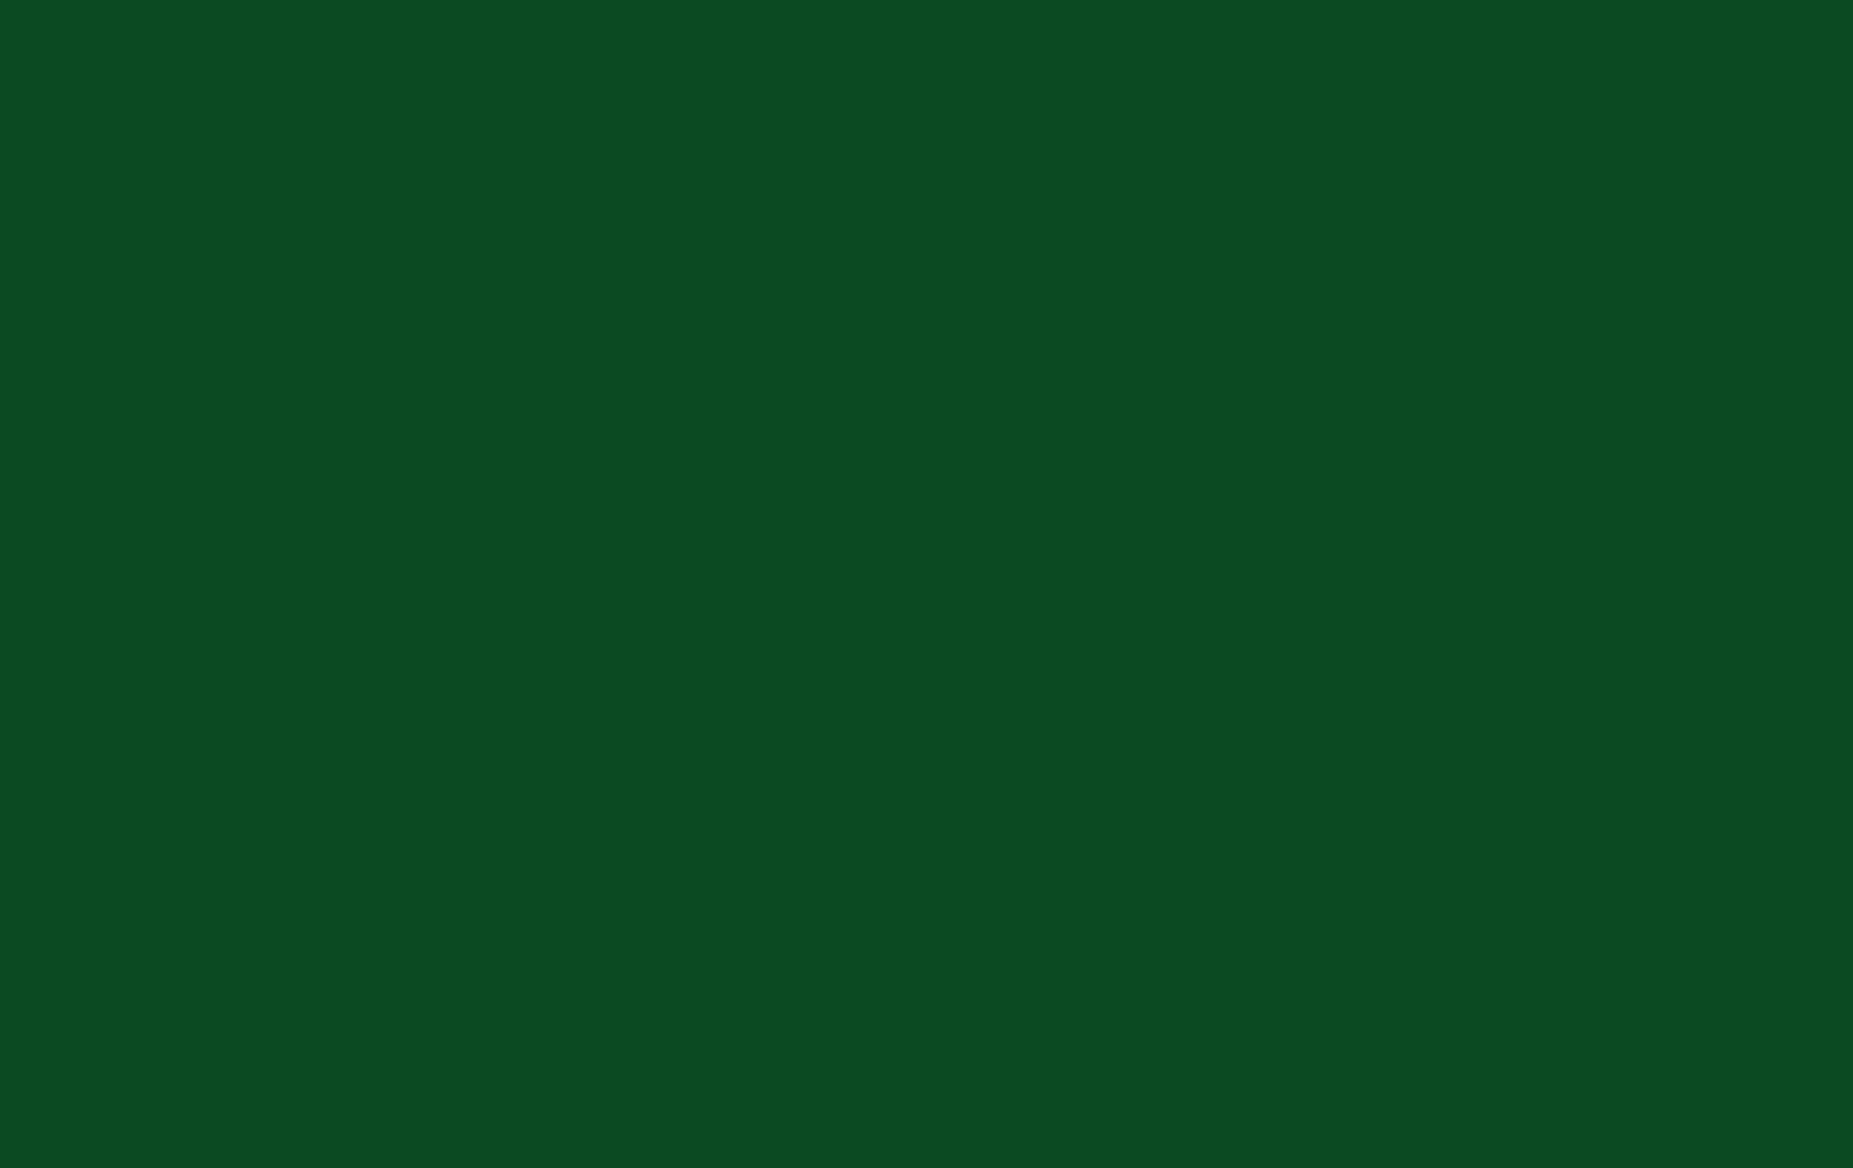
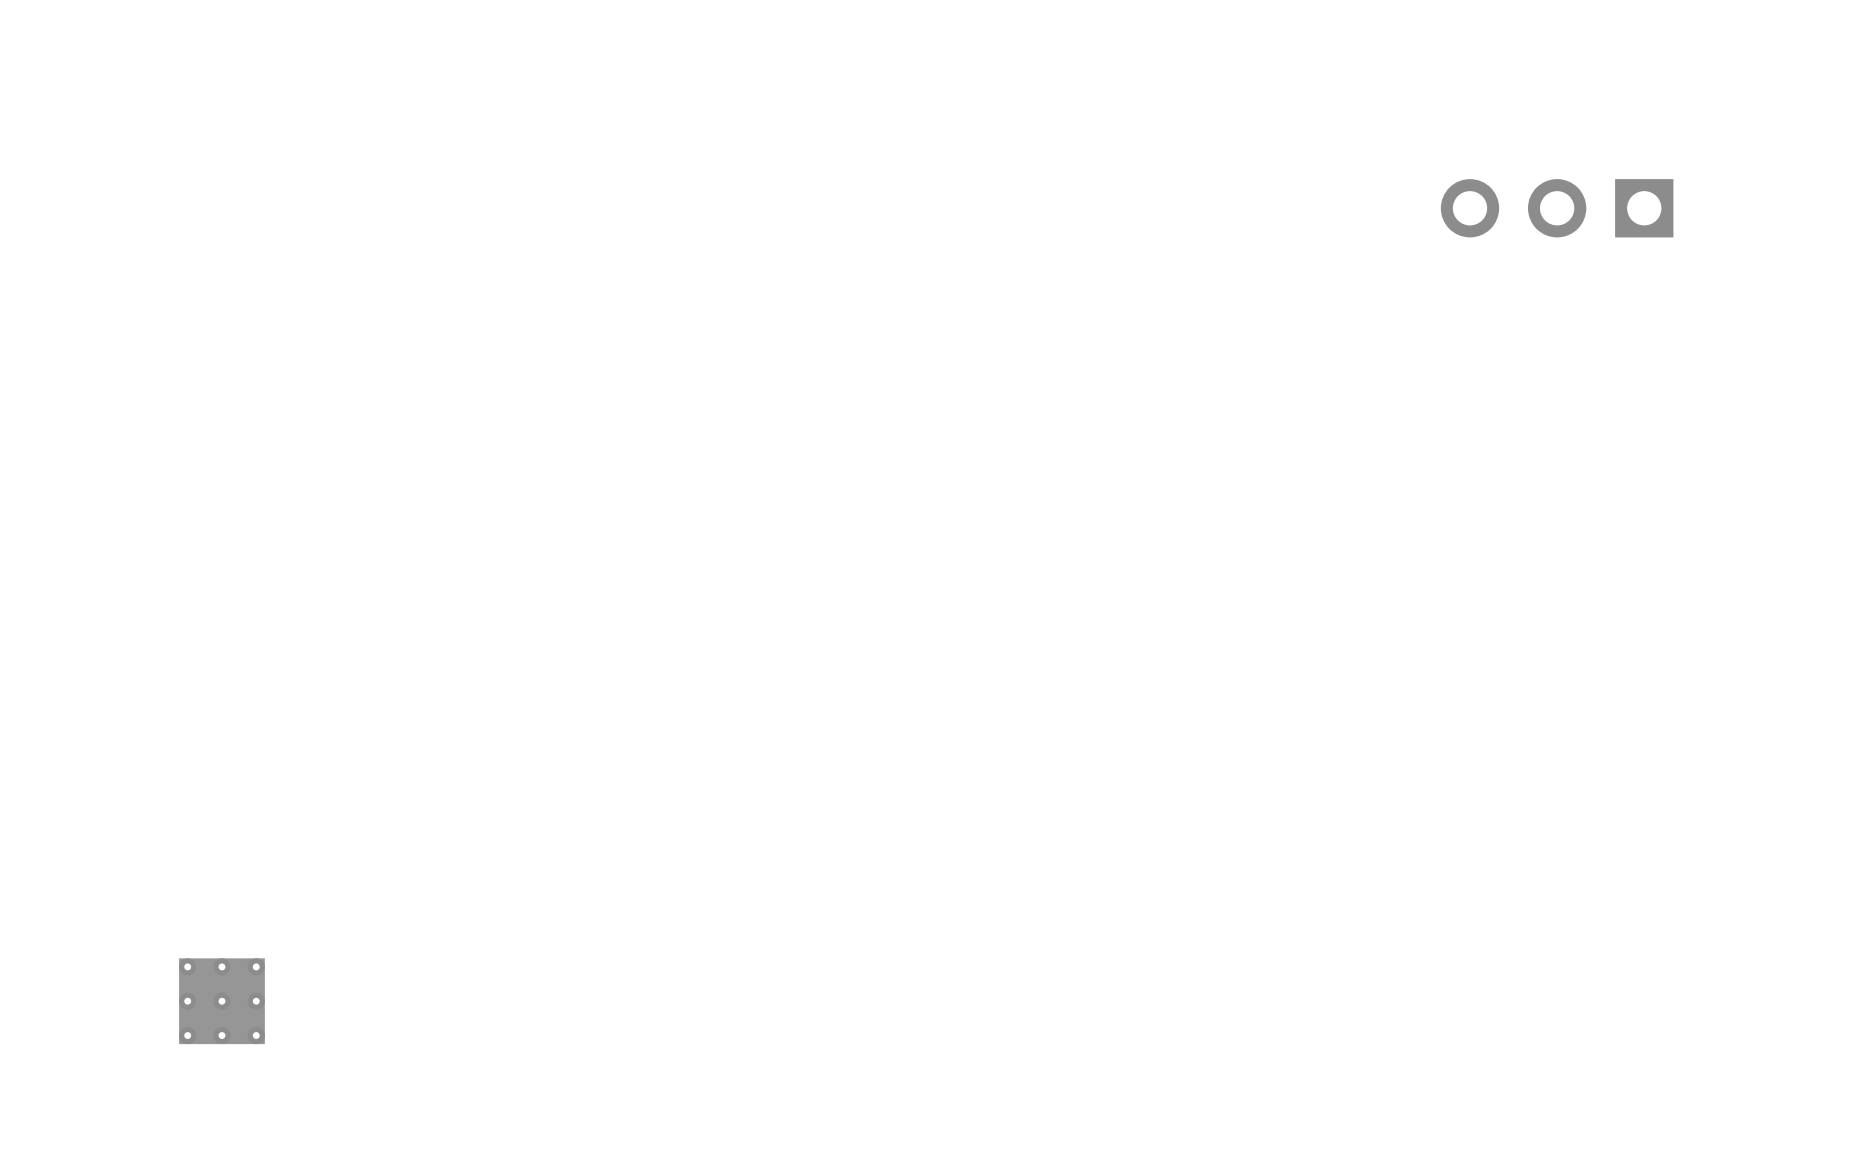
part: none -> (1557, 208)
part: none -> (221, 1001)

